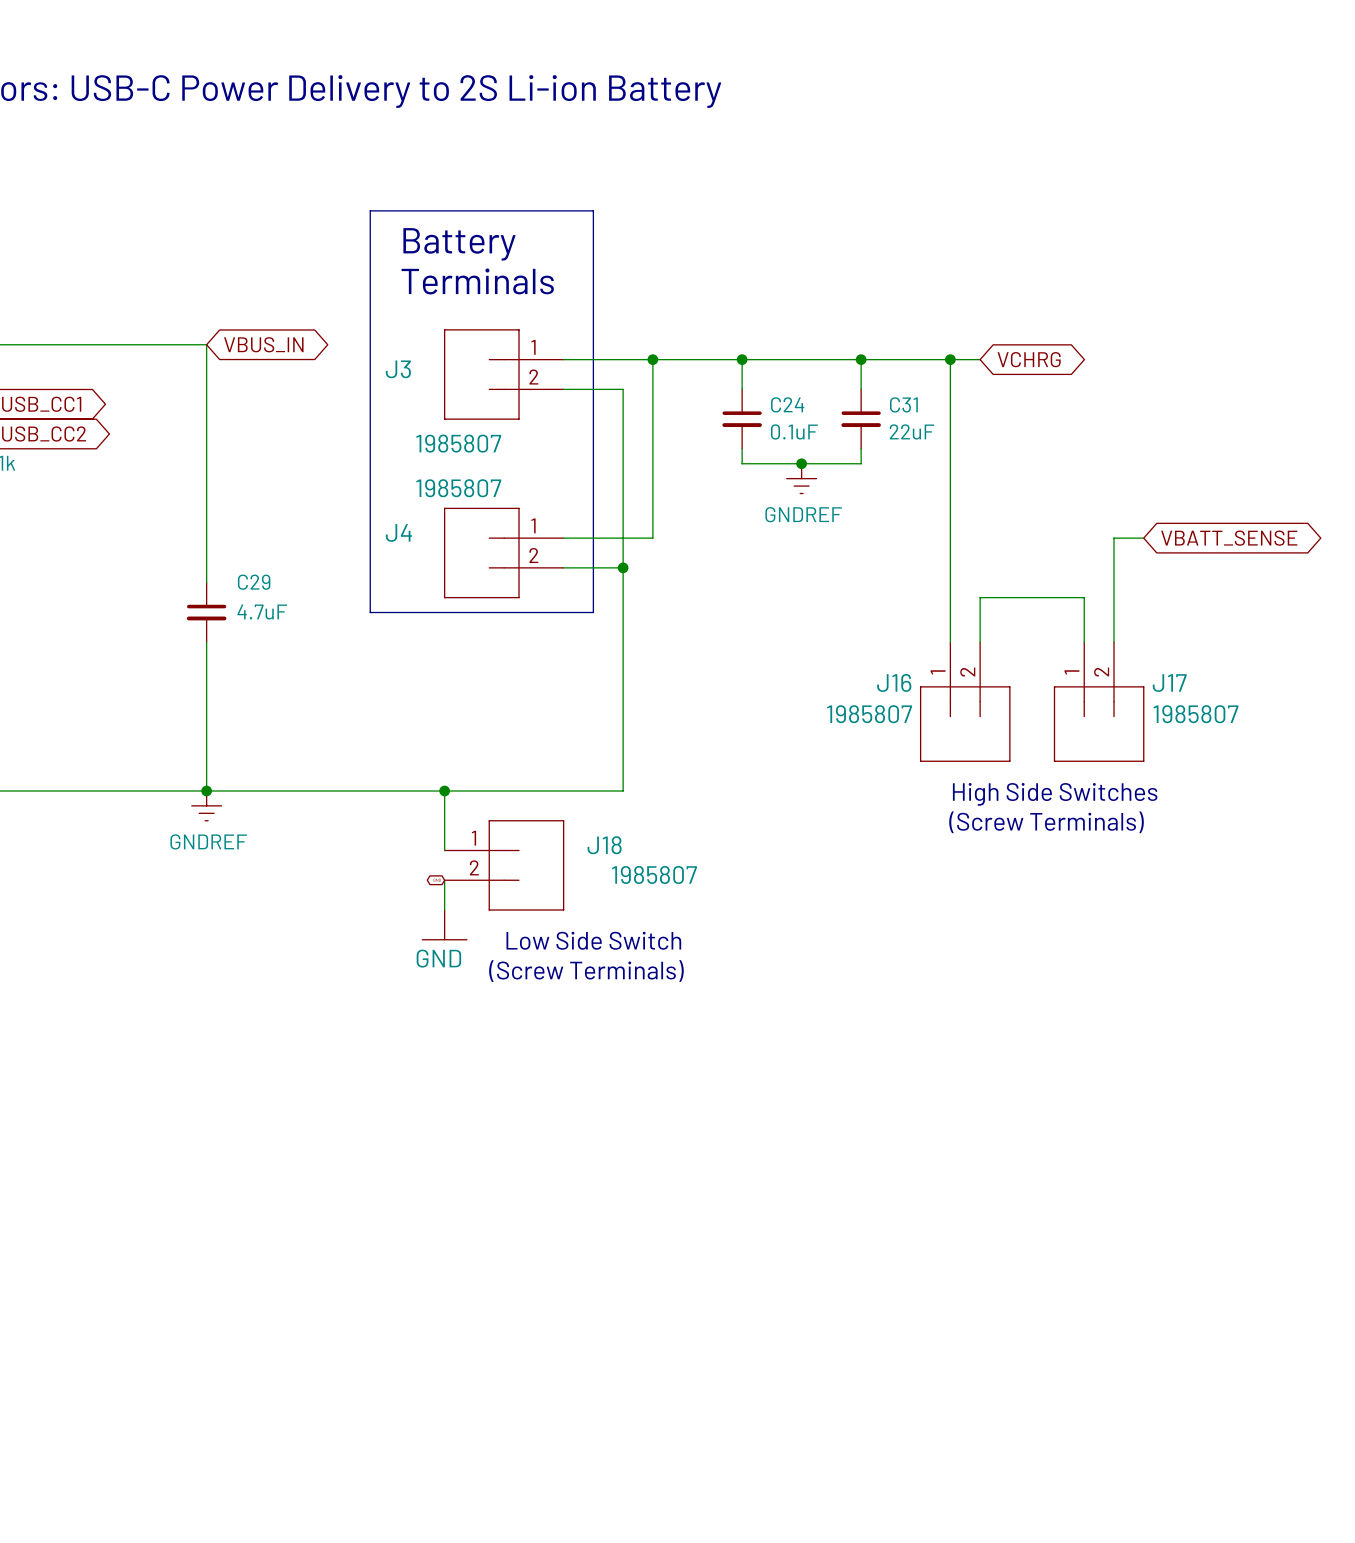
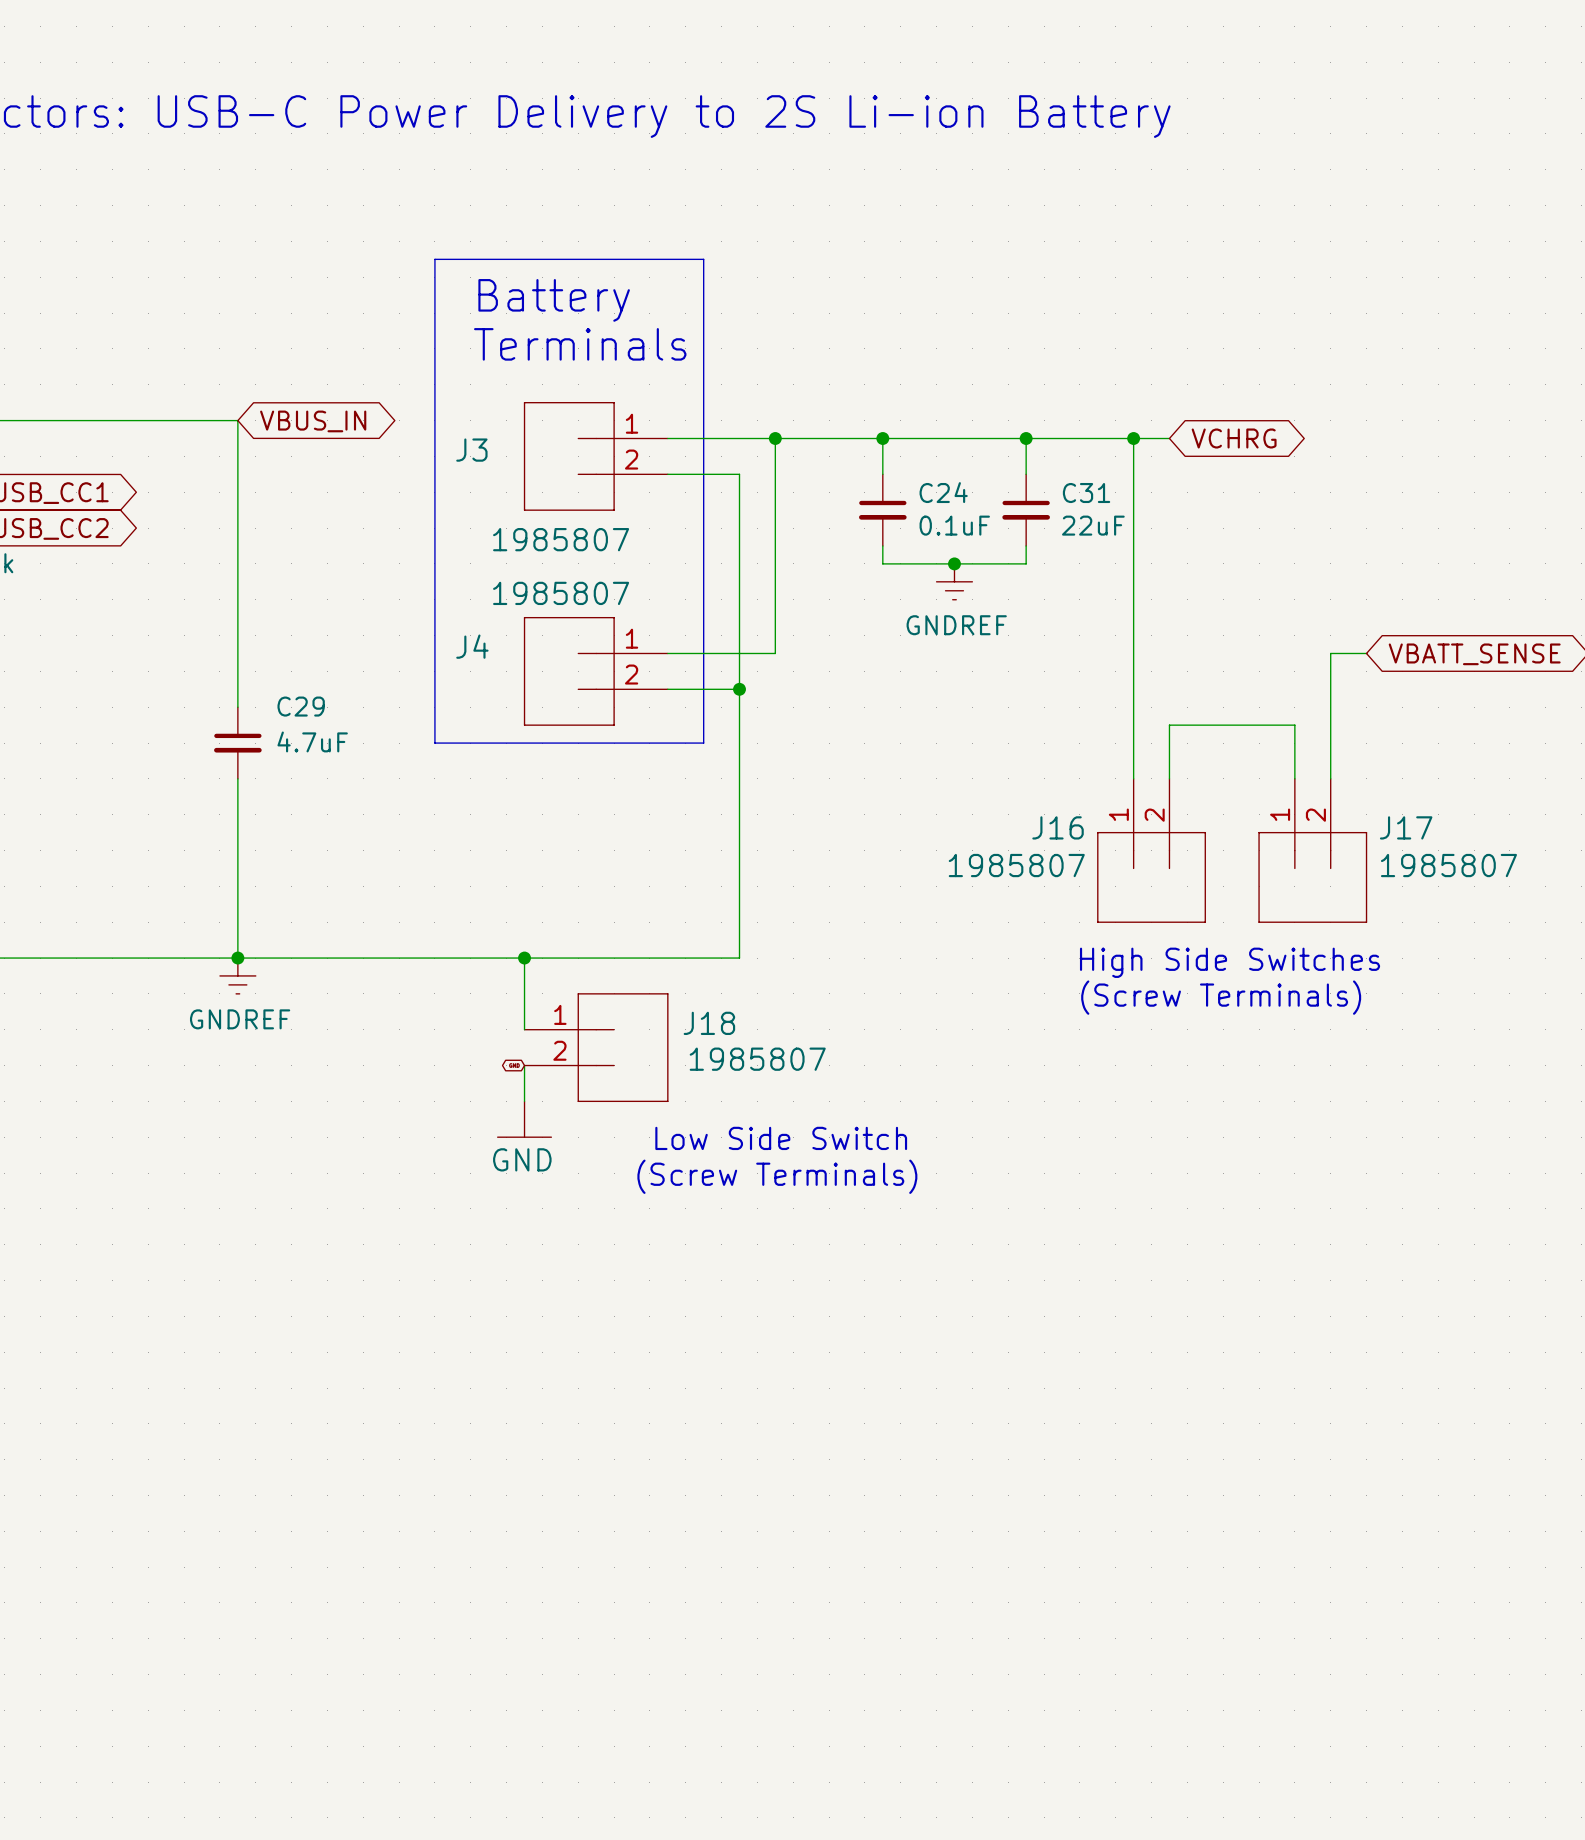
text position: Low Side Switch (593, 940) -> Low Side Switch (781, 1138)
text position: (Screw Terminals) (586, 971) -> (Screw Terminals) (777, 1176)

